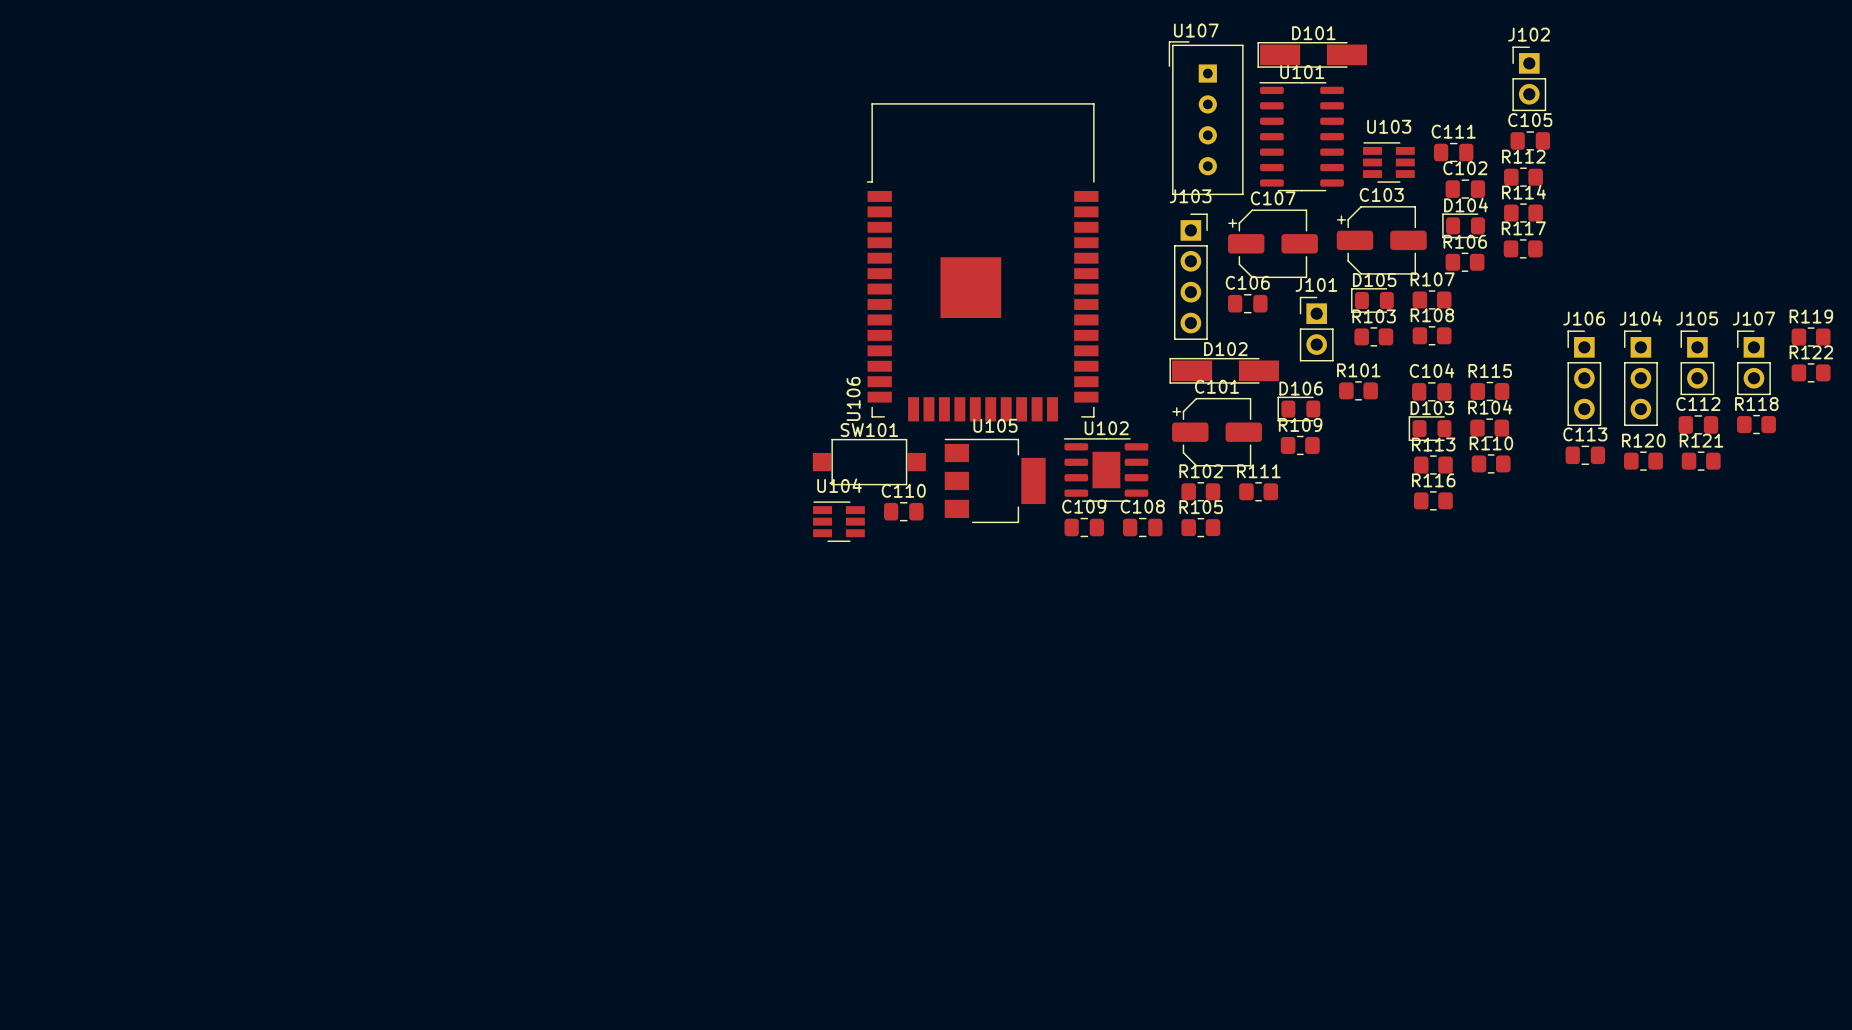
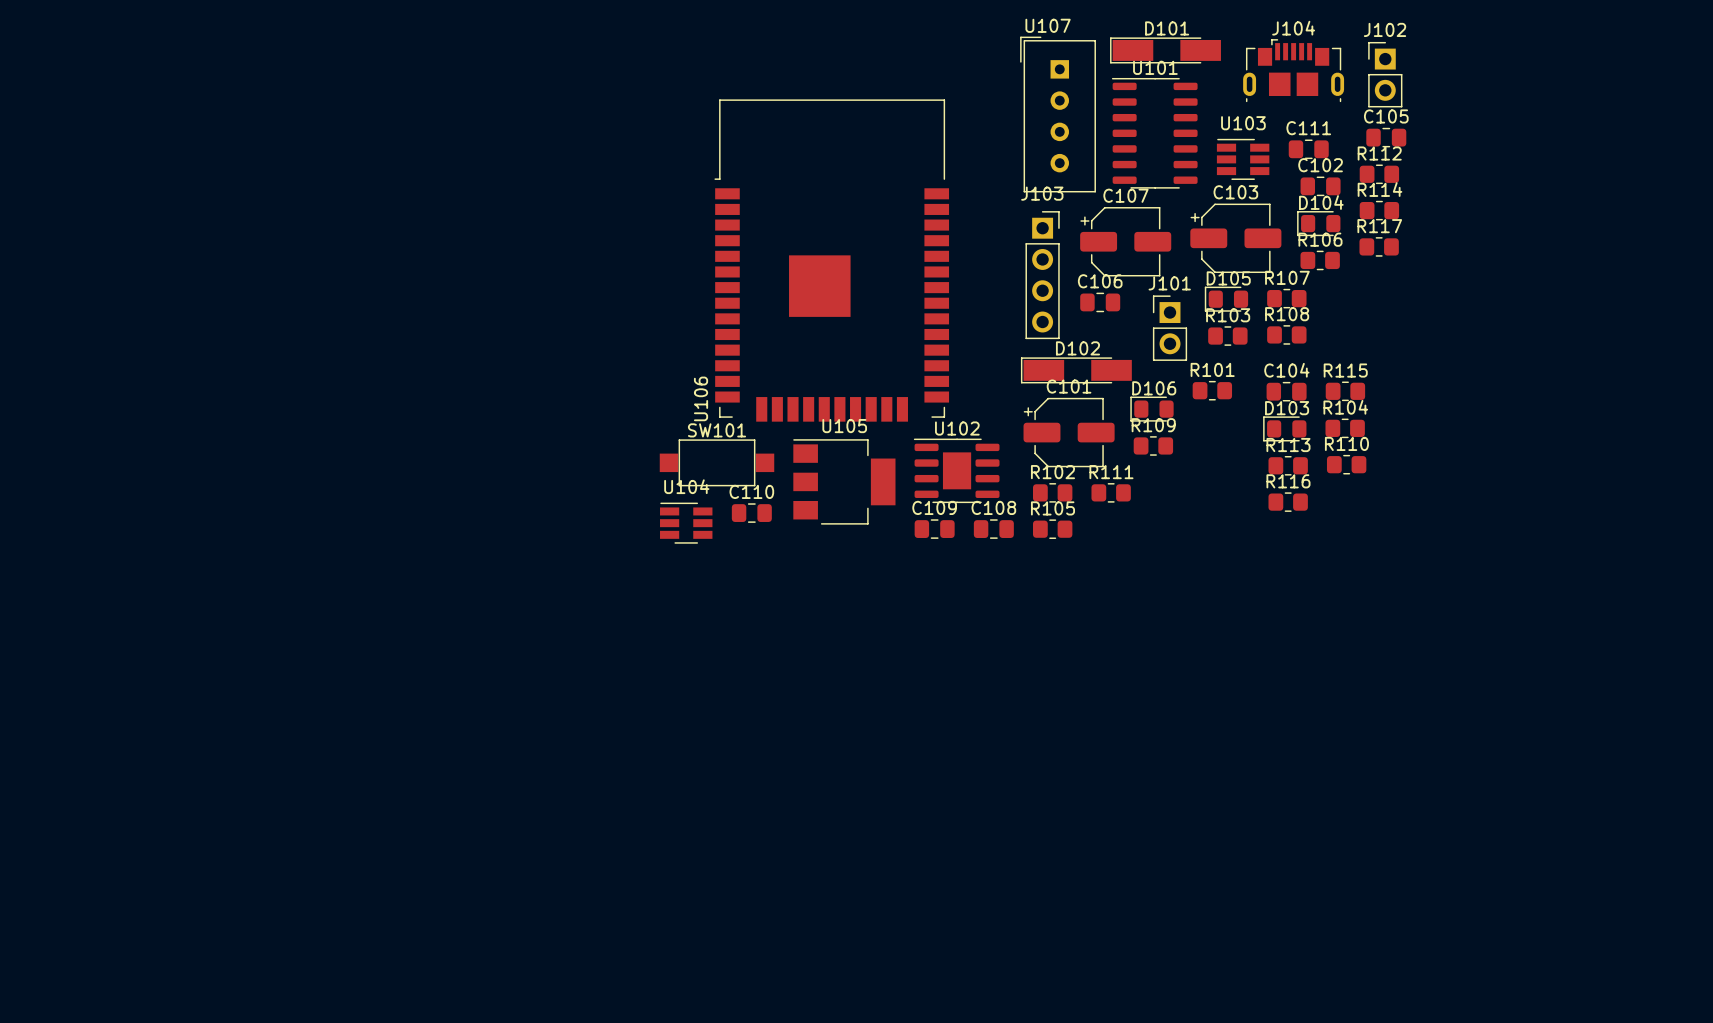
J104 footprint: [1623, 330, 1658, 427] -> [1243, 39, 1345, 103]
R119: (1811, 337) -> none
J105: (1697, 362) -> none
J107: (1753, 362) -> none
R122: (1811, 372) -> none
J106: (1584, 378) -> none
C112: (1698, 424) -> none
R118: (1756, 424) -> none
C113: (1585, 455) -> none
R120: (1643, 461) -> none
R121: (1701, 461) -> none

